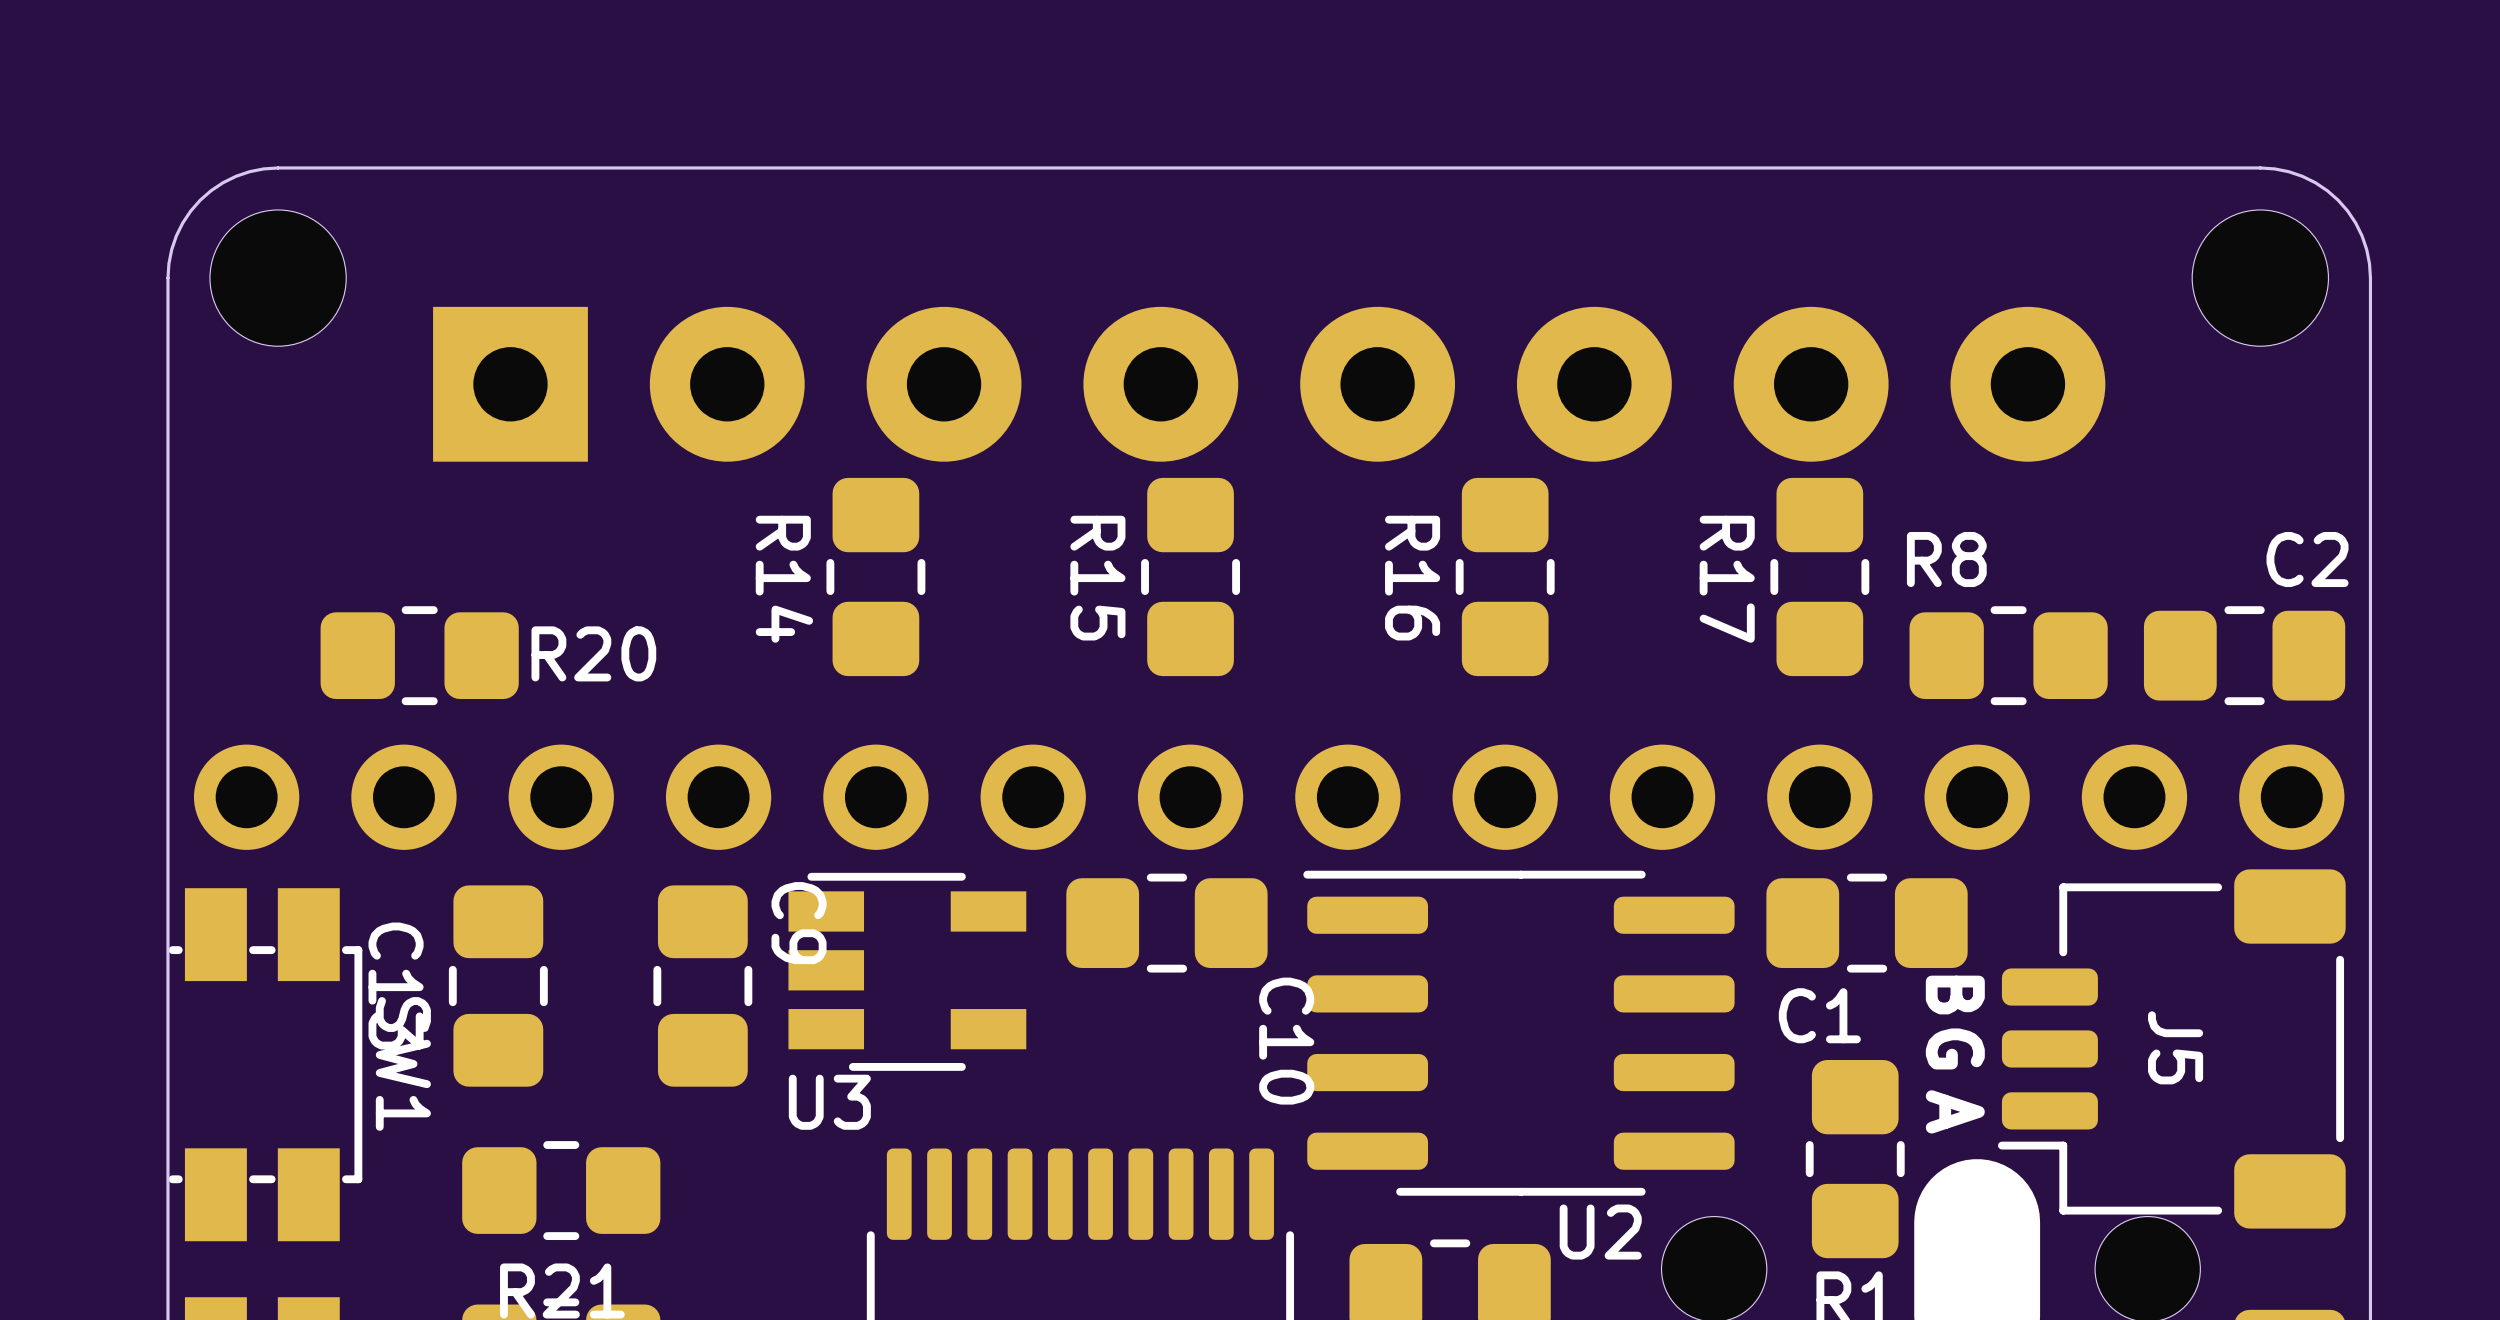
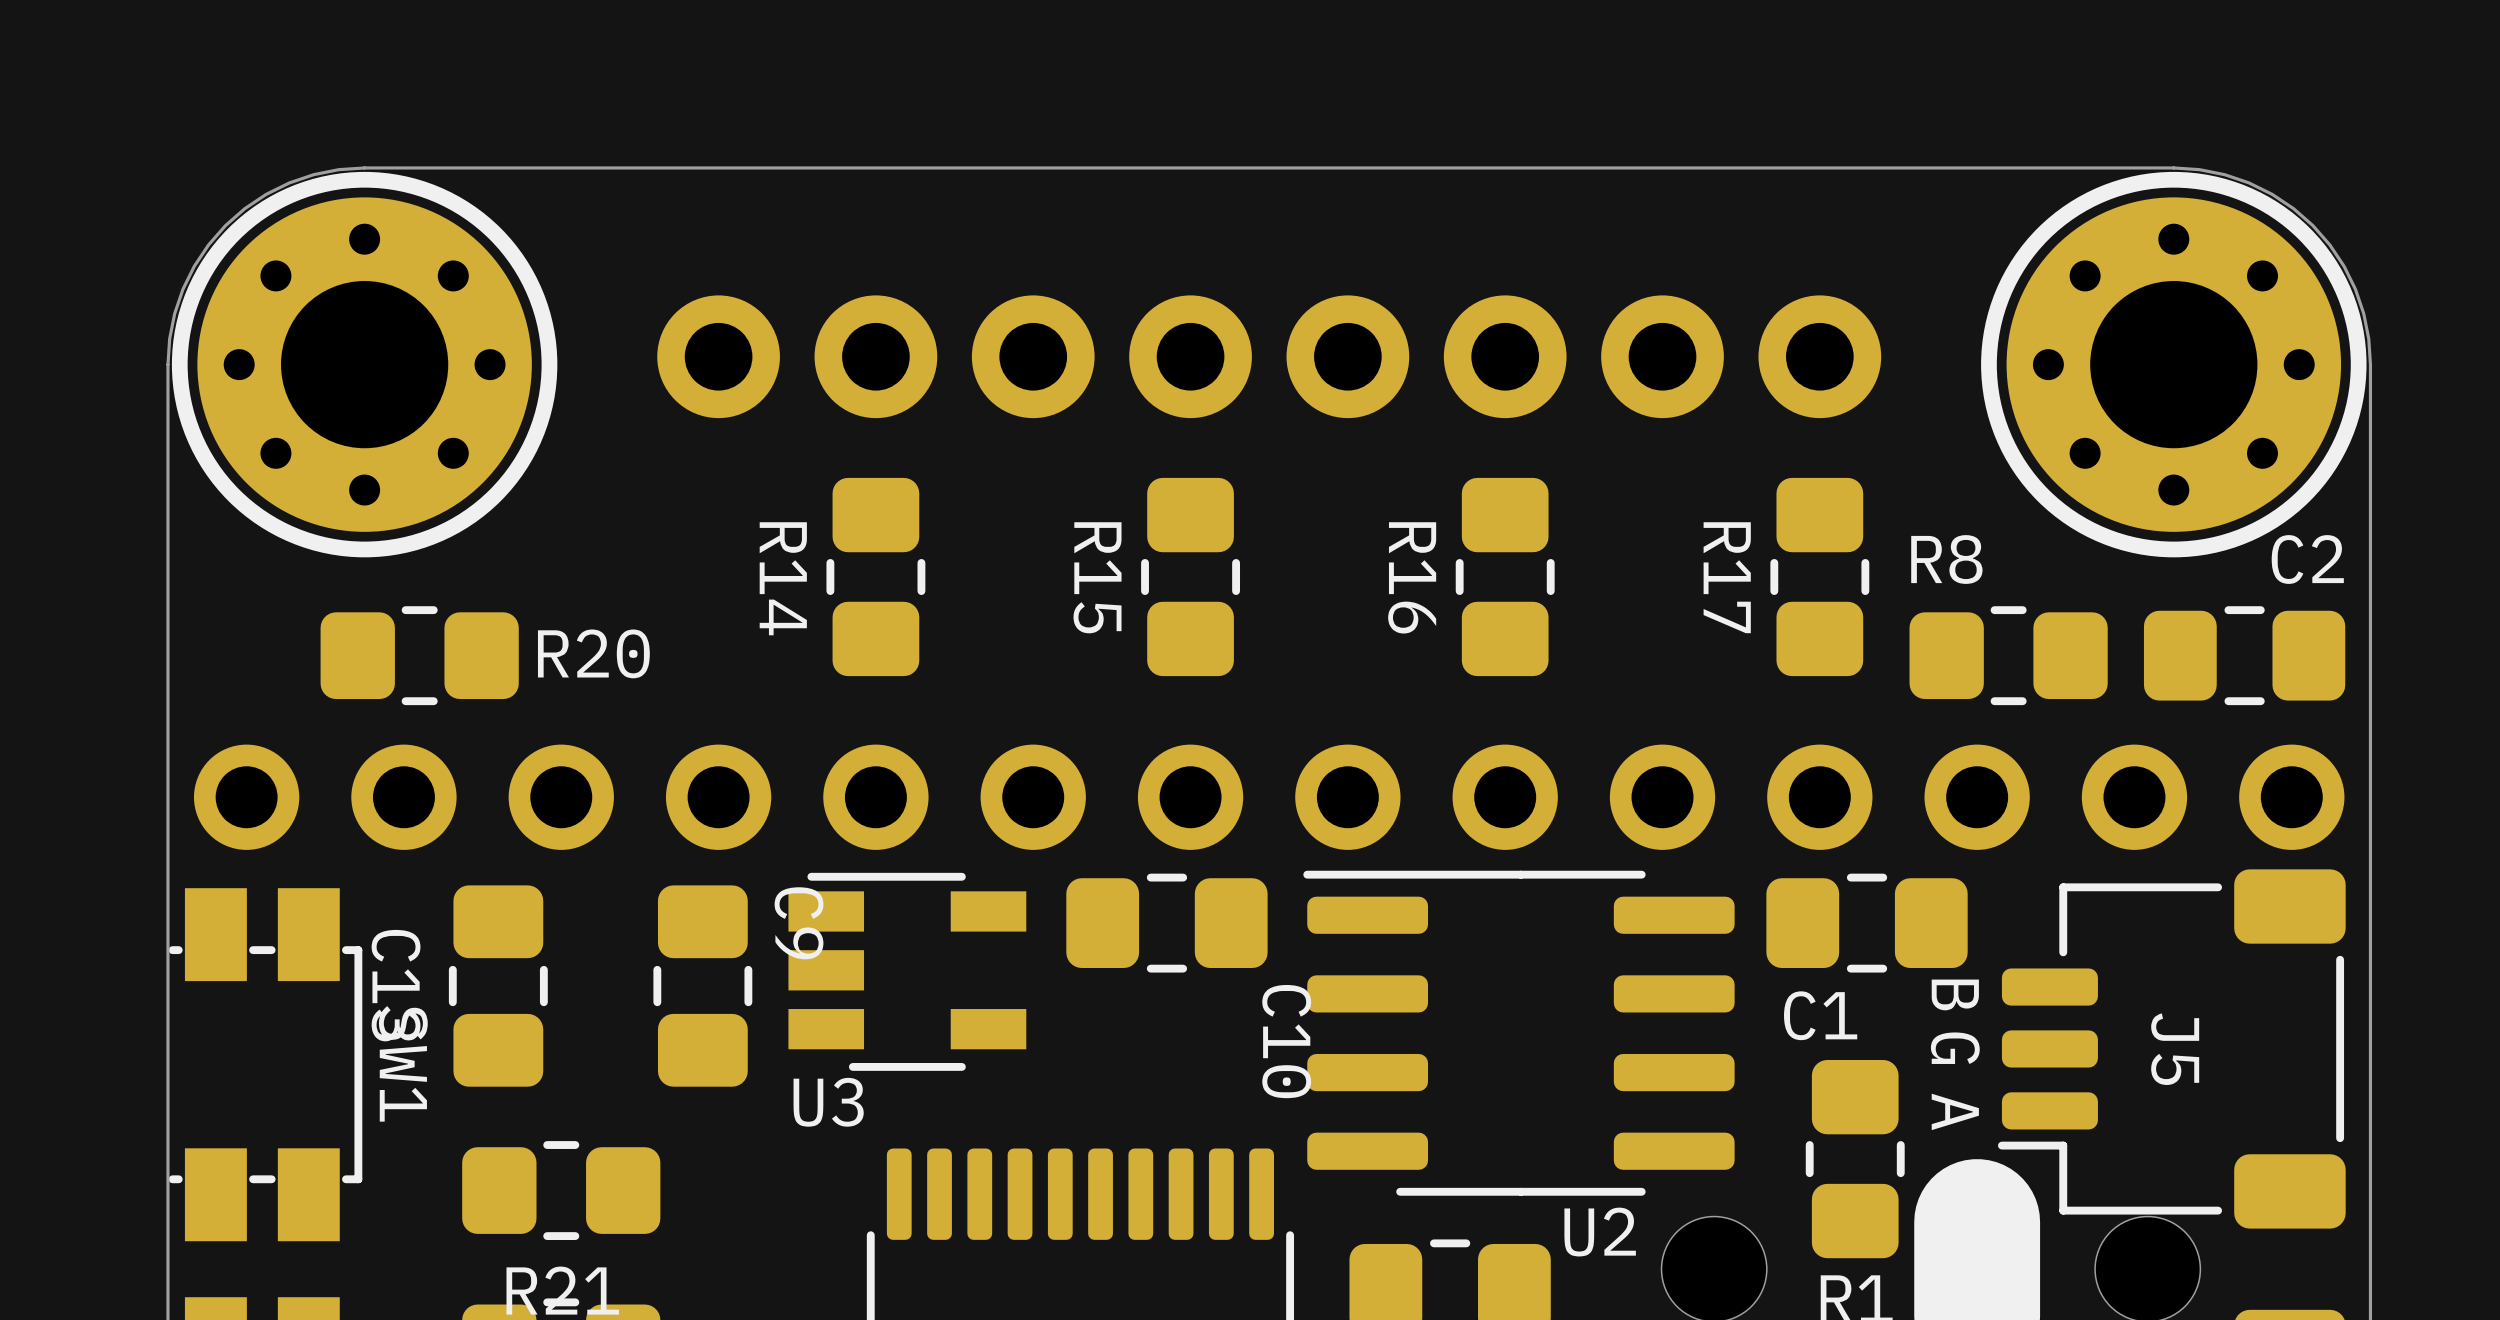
board edge: (364, 167) (263, 168) (249, 171) (223, 182) (200, 200) (190, 211) (176, 235) (168, 263) (167, 364) -> (364, 167) (338, 169) (313, 174) (289, 182) (266, 194) (244, 208) (225, 225) (208, 244) (194, 266) (182, 289) (174, 313) (169, 338) (167, 364)
board edge: (2173, 167) (2274, 168) (2302, 176) (2327, 190) (2338, 200) (2355, 223) (2366, 249) (2369, 263) (2370, 364) -> (2173, 167) (2199, 169) (2224, 174) (2249, 182) (2272, 194) (2293, 208) (2312, 225) (2329, 244) (2344, 266) (2355, 289) (2363, 313) (2368, 338) (2370, 364)
drawing: none -> [171, 171, 558, 558]
drawing: none -> [1981, 171, 2367, 558]
part: (278, 278) -> none
part: (2260, 278) -> none
part footprint: [433, 306, 2106, 462] -> [657, 295, 1882, 419]
part: none -> (364, 364)
part: none -> (2173, 364)

